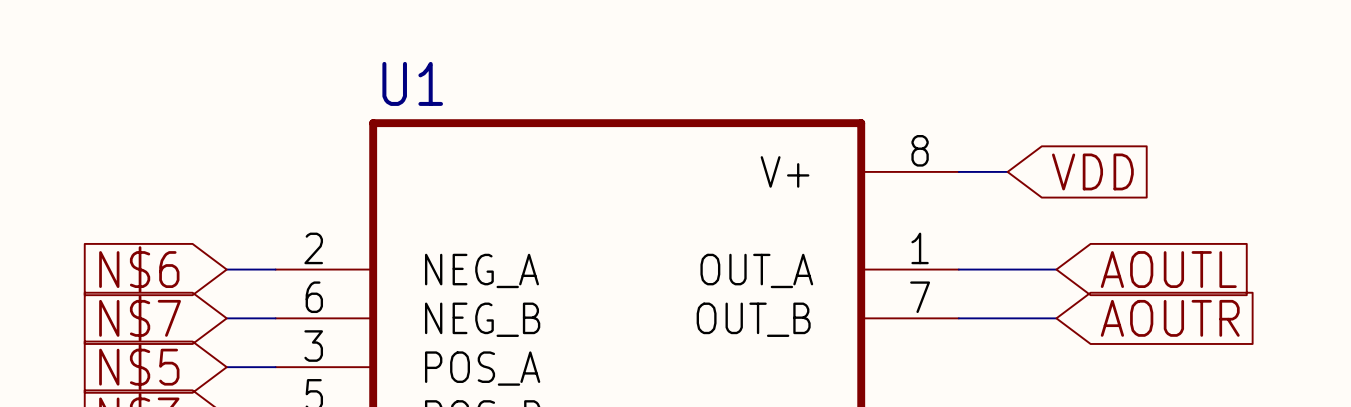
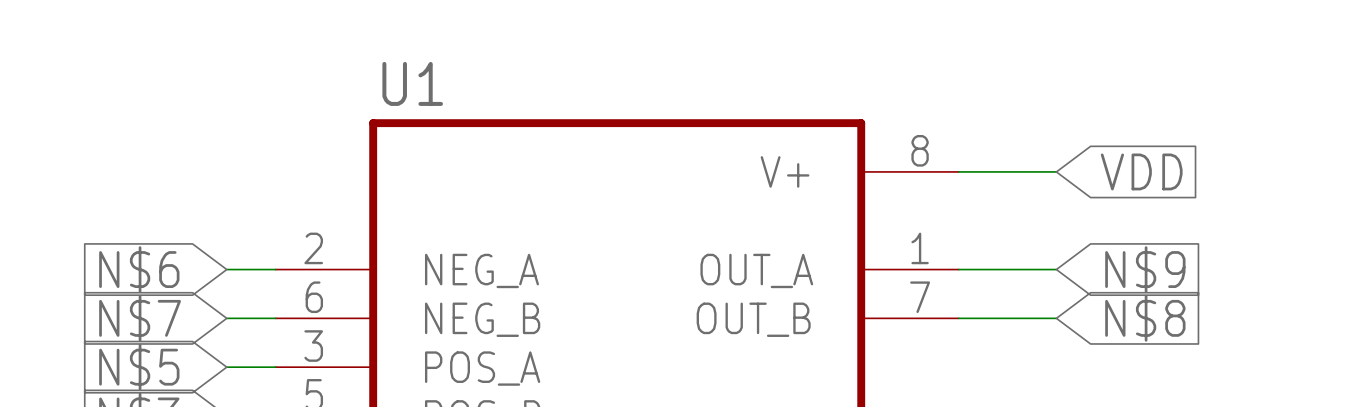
wire: none -> (1007, 171) (1056, 171)
global label position: VDD (1092, 171) -> VDD (1141, 171)
global label: AOUTL (1168, 269) -> N$9 (1145, 269)
global label: AOUTR (1170, 318) -> N$8 (1145, 318)

